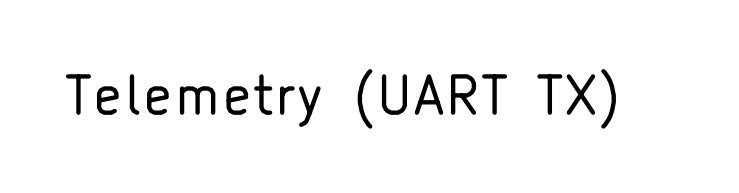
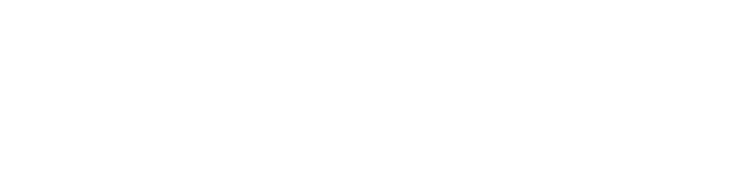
text: Telemetry (UART TX) (340, 98) -> none

